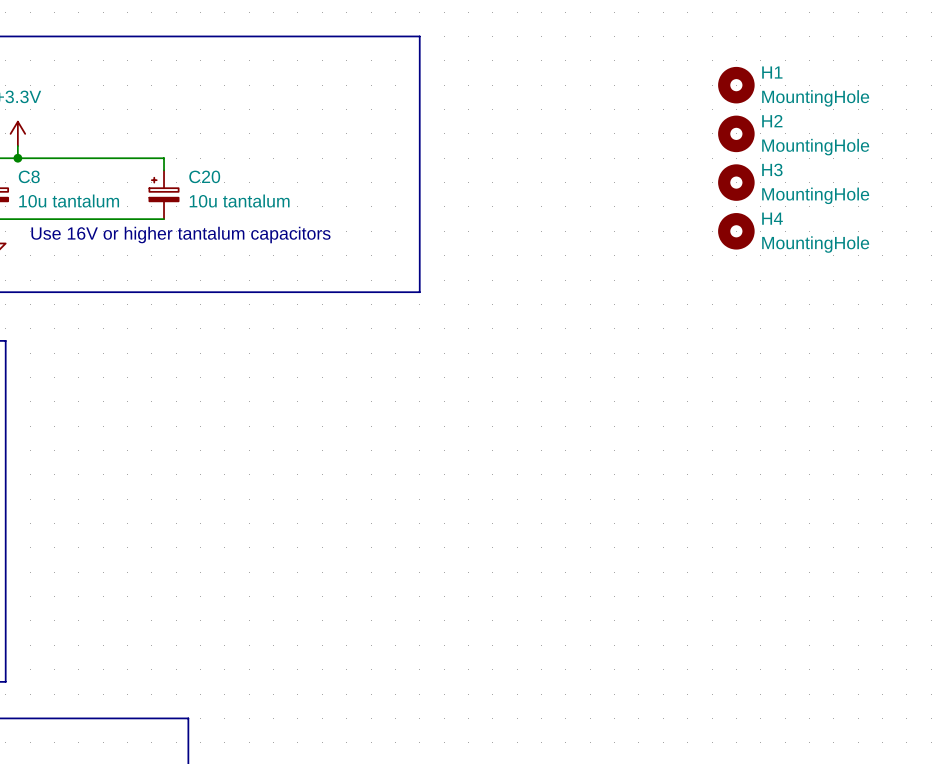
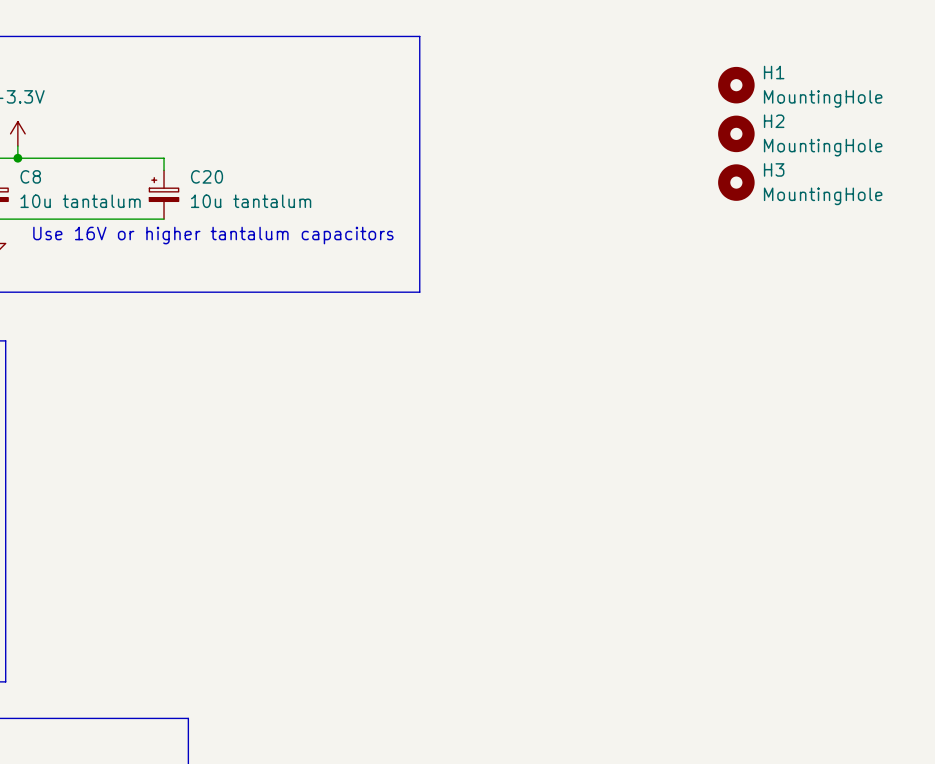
H4: MountingHole (736, 231) -> none

